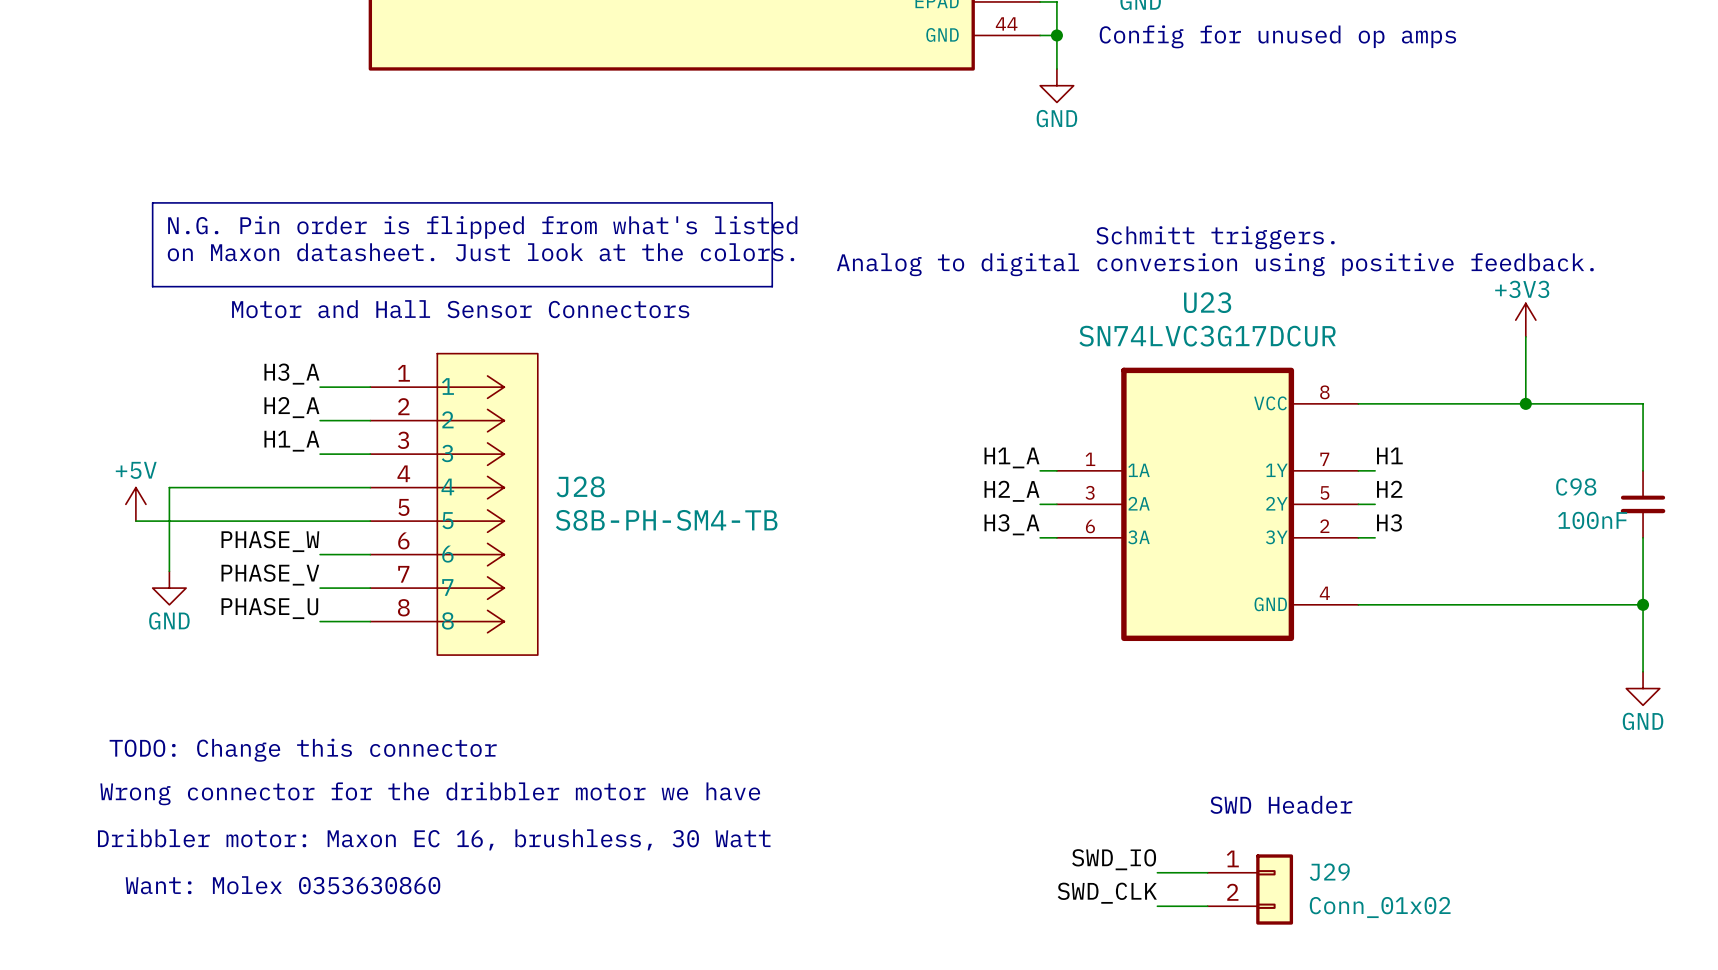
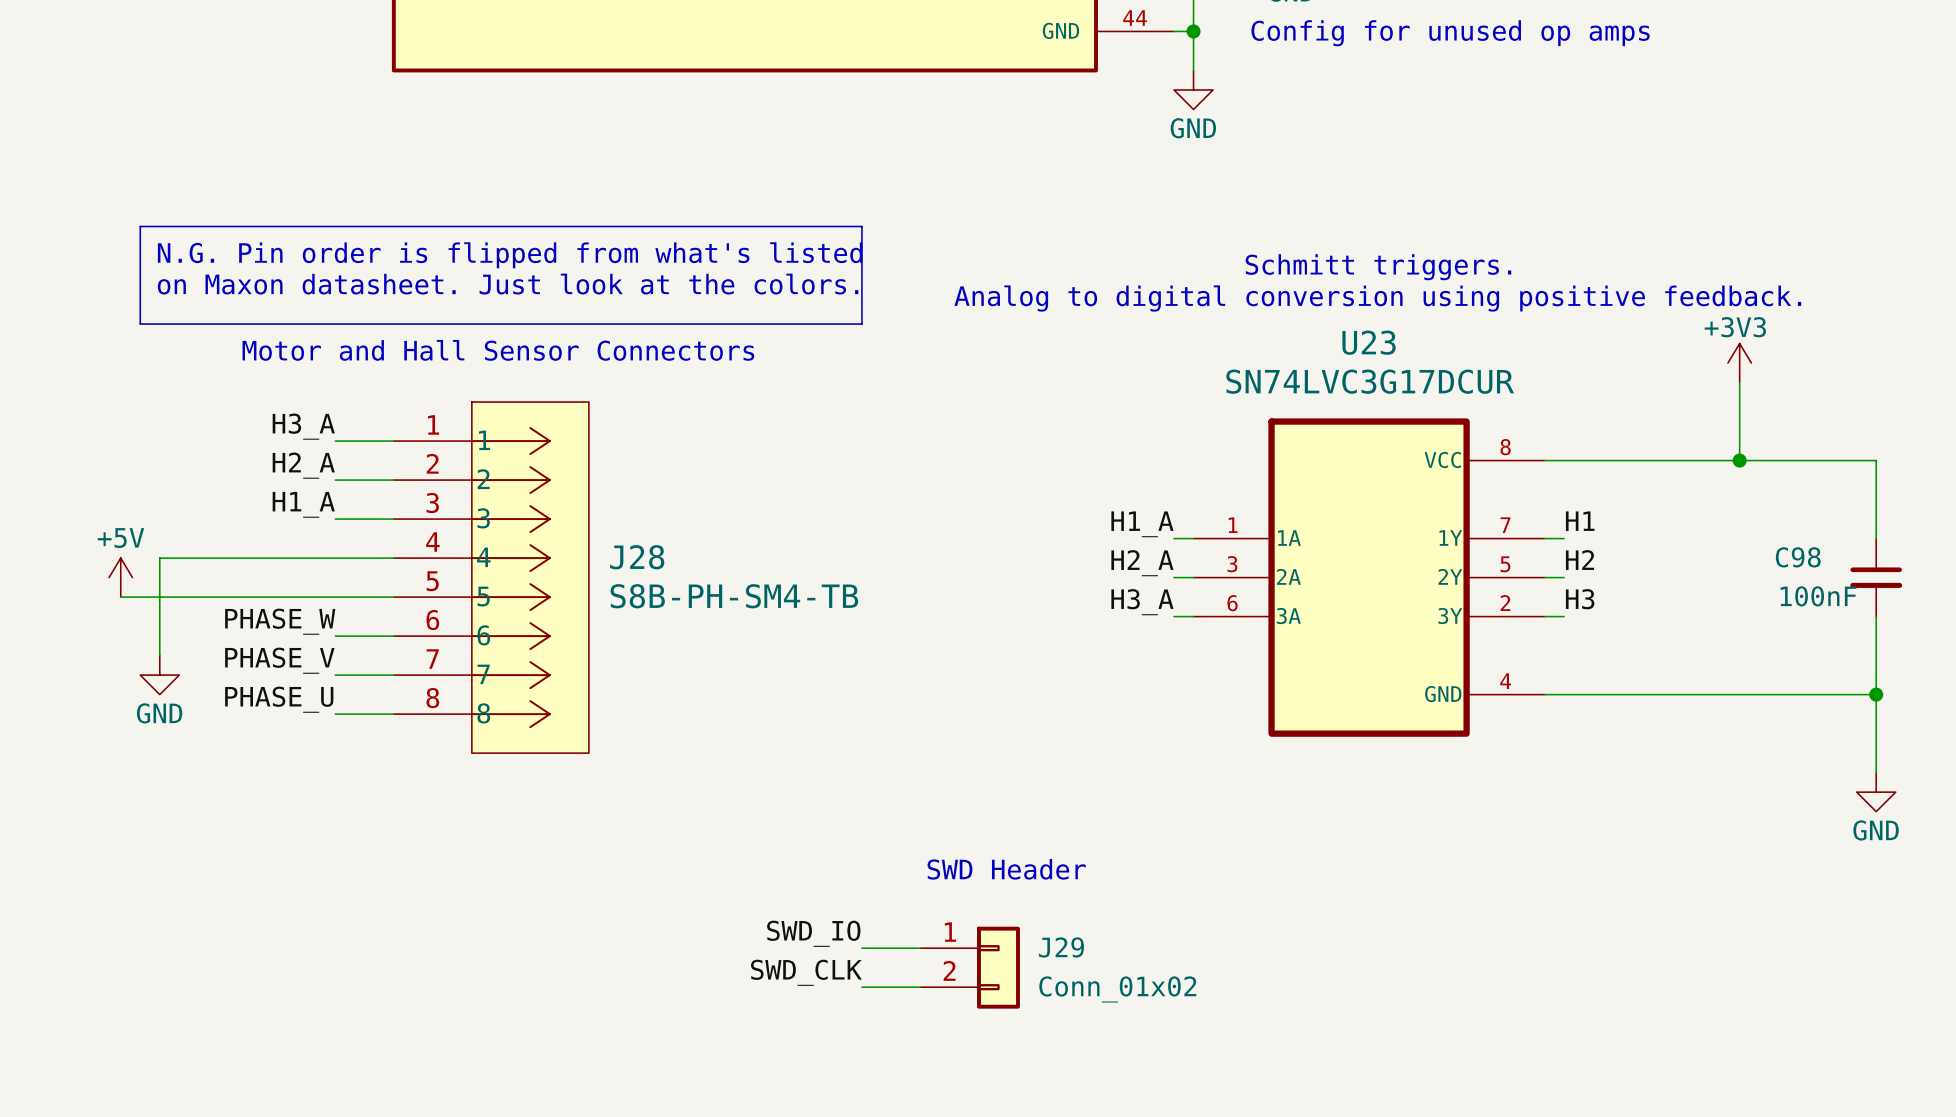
text: TODO: Change this connector (303, 750) -> none
text: none -> SWD Header (1006, 869)
text: Wrong connector for the dribbler motor we have (430, 793) -> none
text: SWD Header (1281, 804) -> none
label: none -> SWD_IO (813, 933)
wire: none -> (861, 948) (920, 948)
text: Dribbler motor: Maxon EC 16, brushless, 30 Watt (434, 839) -> none
label: none -> SWD_CLK (806, 972)
wire: none -> (861, 987) (920, 987)
label: SWD_IO (1114, 859) -> none
wire: (1157, 872) (1207, 872) -> none
text: Want: Molex 0353630860 (283, 885) -> none
J29 position: (1250, 889) -> (970, 967)
label: SWD_CLK (1107, 893) -> none
wire: (1157, 906) (1207, 906) -> none

